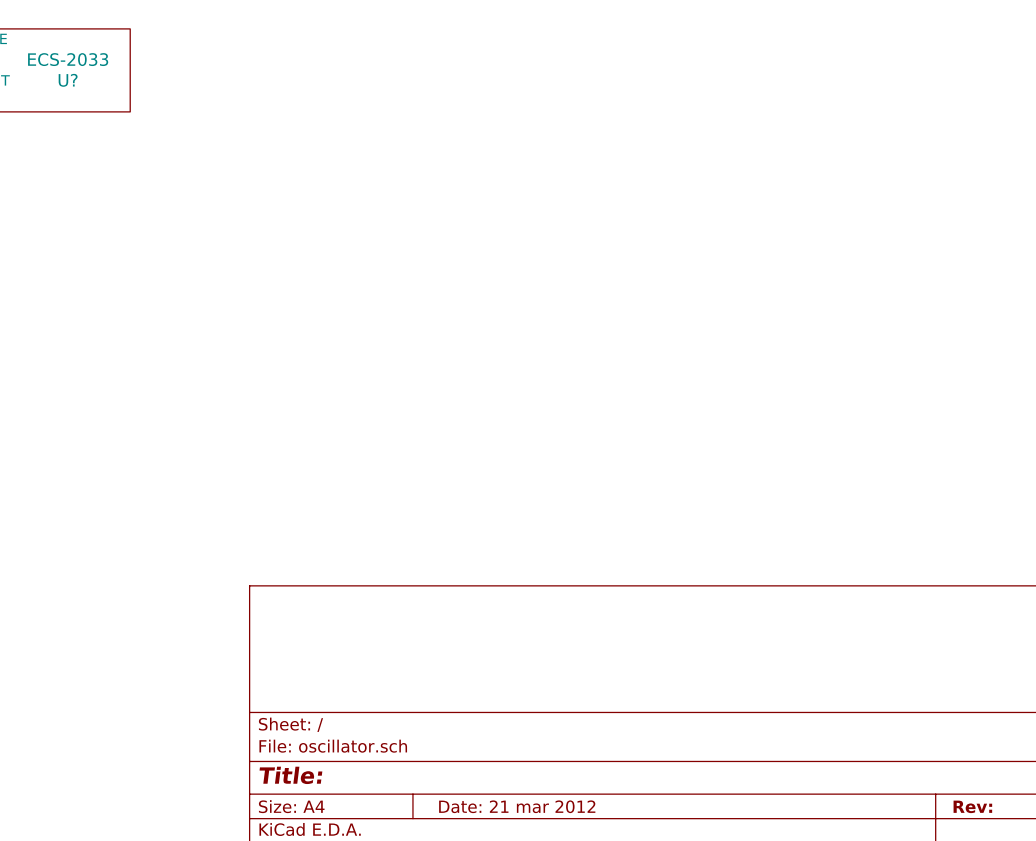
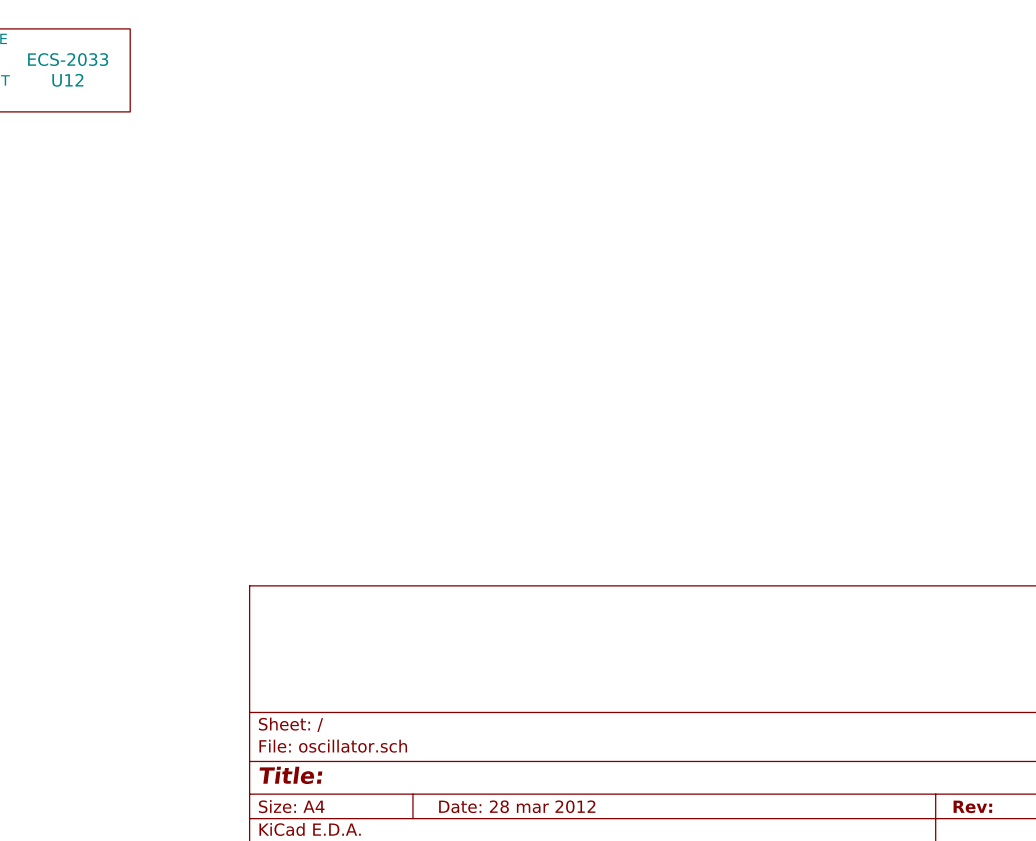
U? name: U? (68, 80) -> U12 (67, 80)
title block: Date: 21 mar 2012 (517, 806) -> Date: 28 mar 2012 (517, 806)

